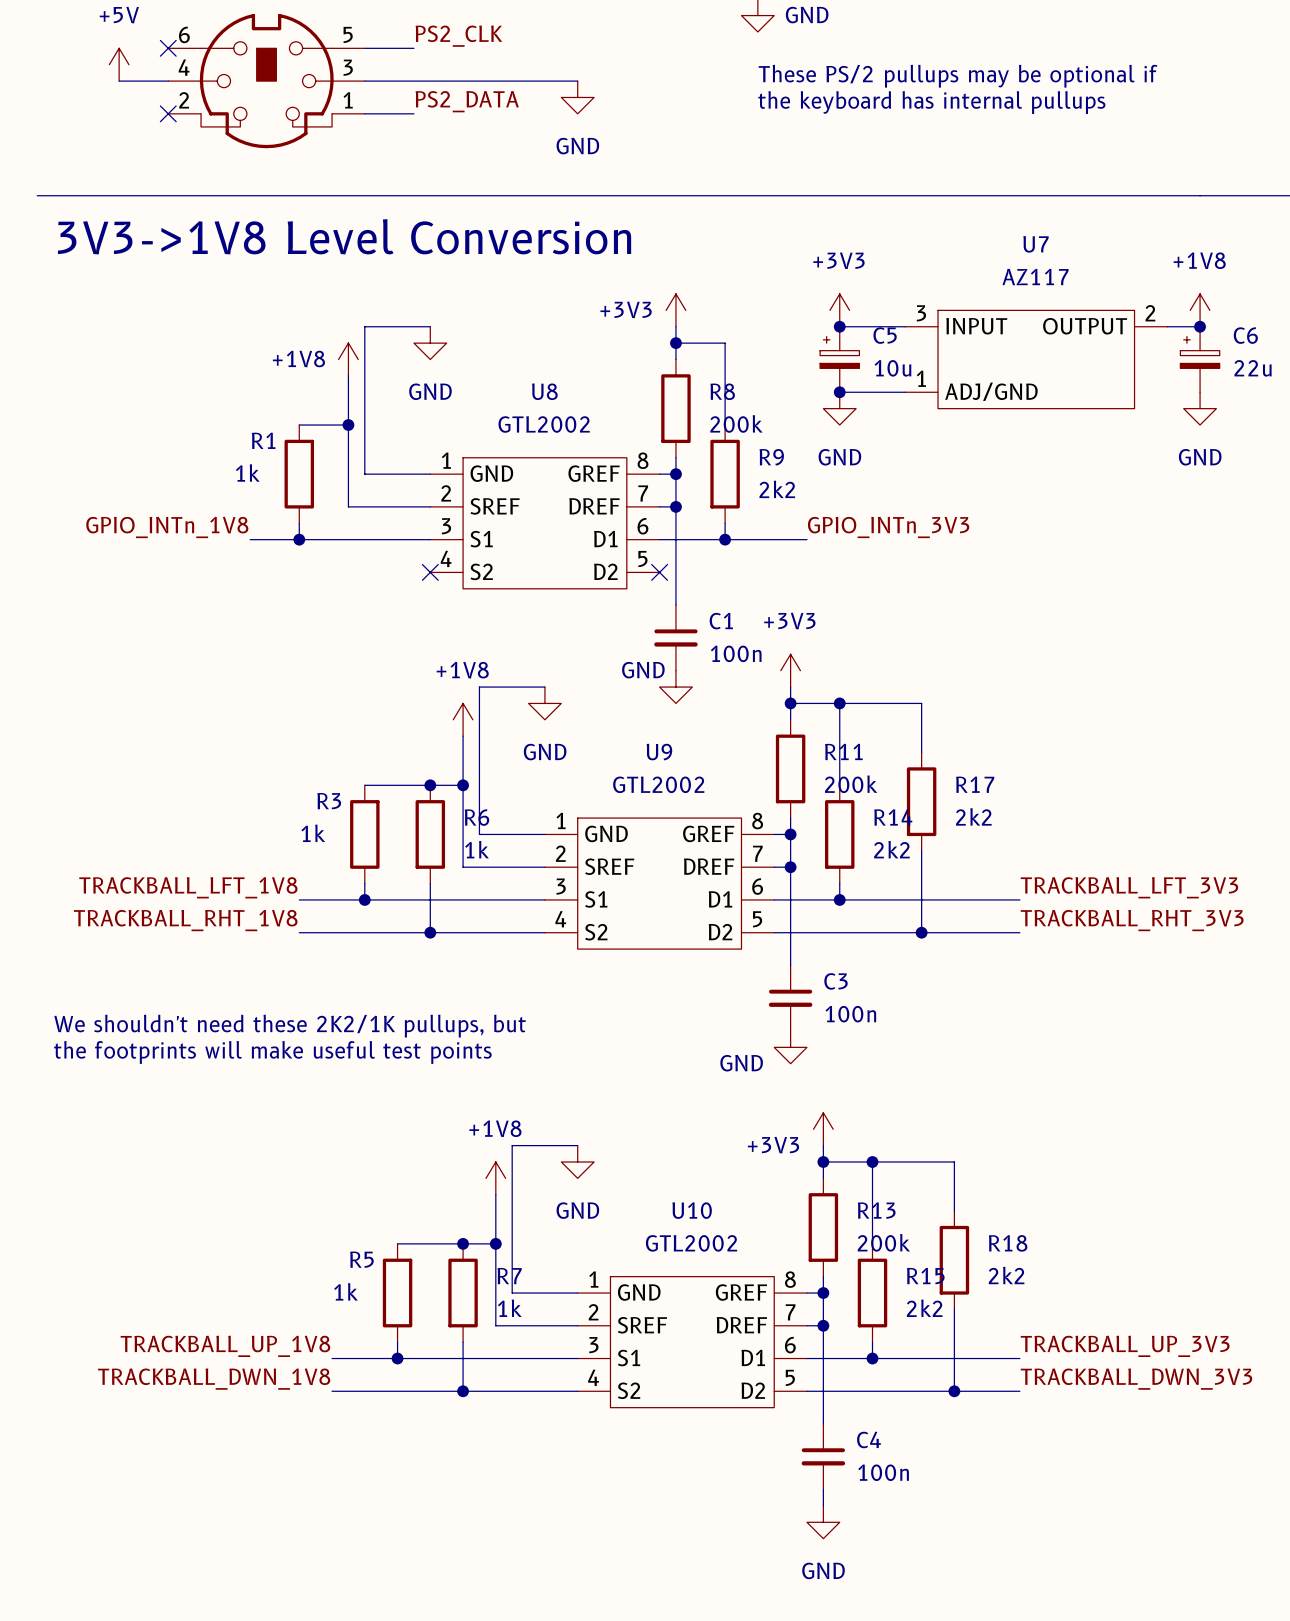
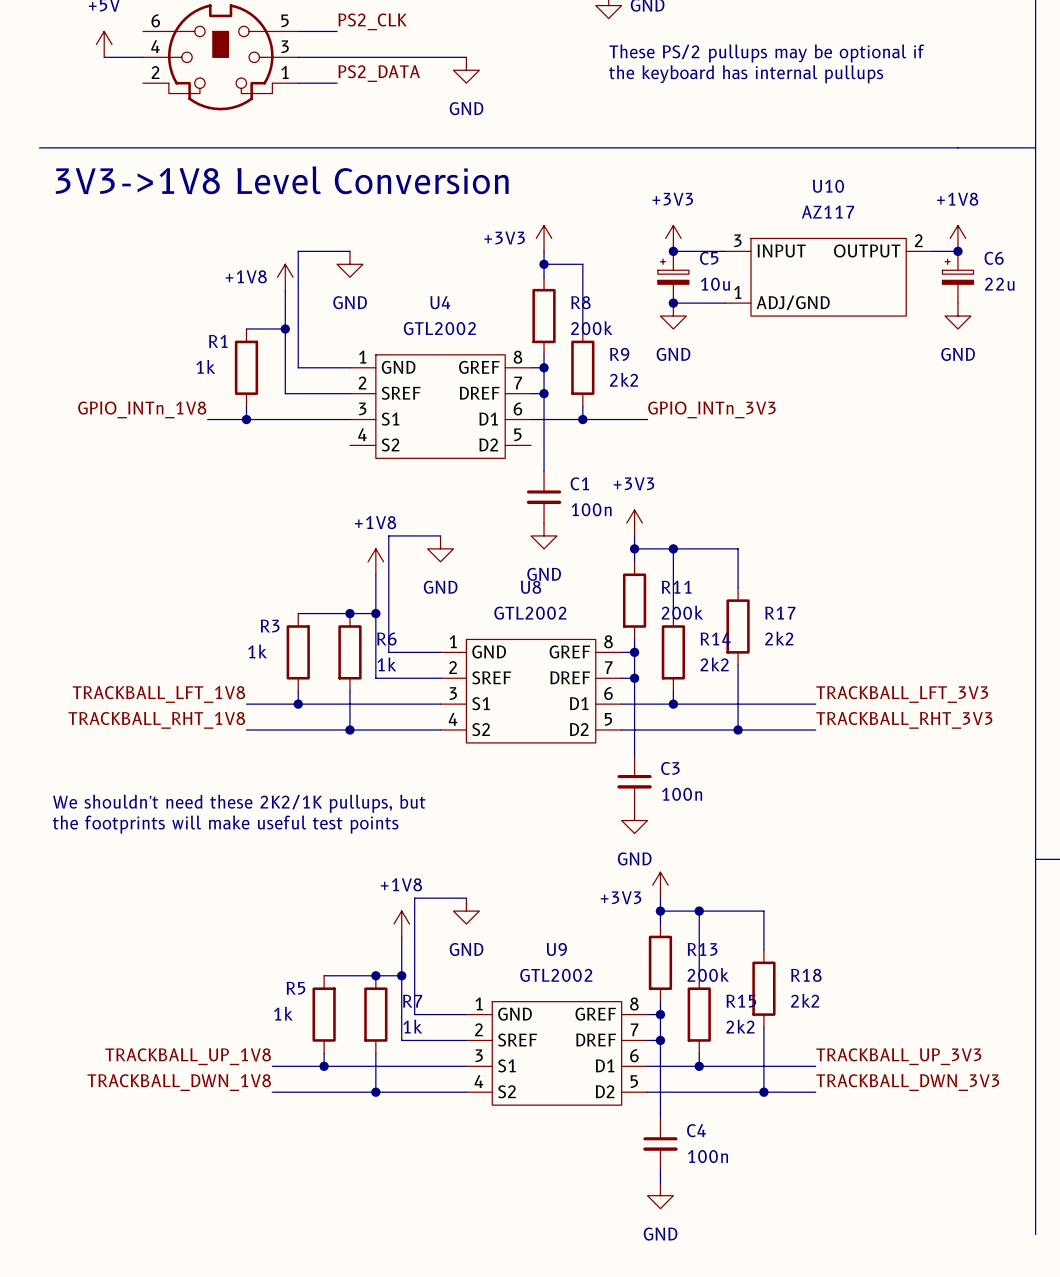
no-connect mark: (168, 48) -> none
no-connect mark: (168, 113) -> none
U7 name: U7 (1036, 244) -> U10 (828, 186)
U8 name: U8 (544, 391) -> U4 (440, 302)
no-connect mark: (430, 572) -> none
no-connect mark: (659, 572) -> none
power symbol text position: GND (643, 670) -> GND (544, 574)
U9 name: U9 (659, 752) -> U8 (531, 587)
power symbol text position: GND (741, 1063) -> GND (634, 858)
U10 name: U10 (692, 1210) -> U9 (556, 949)

